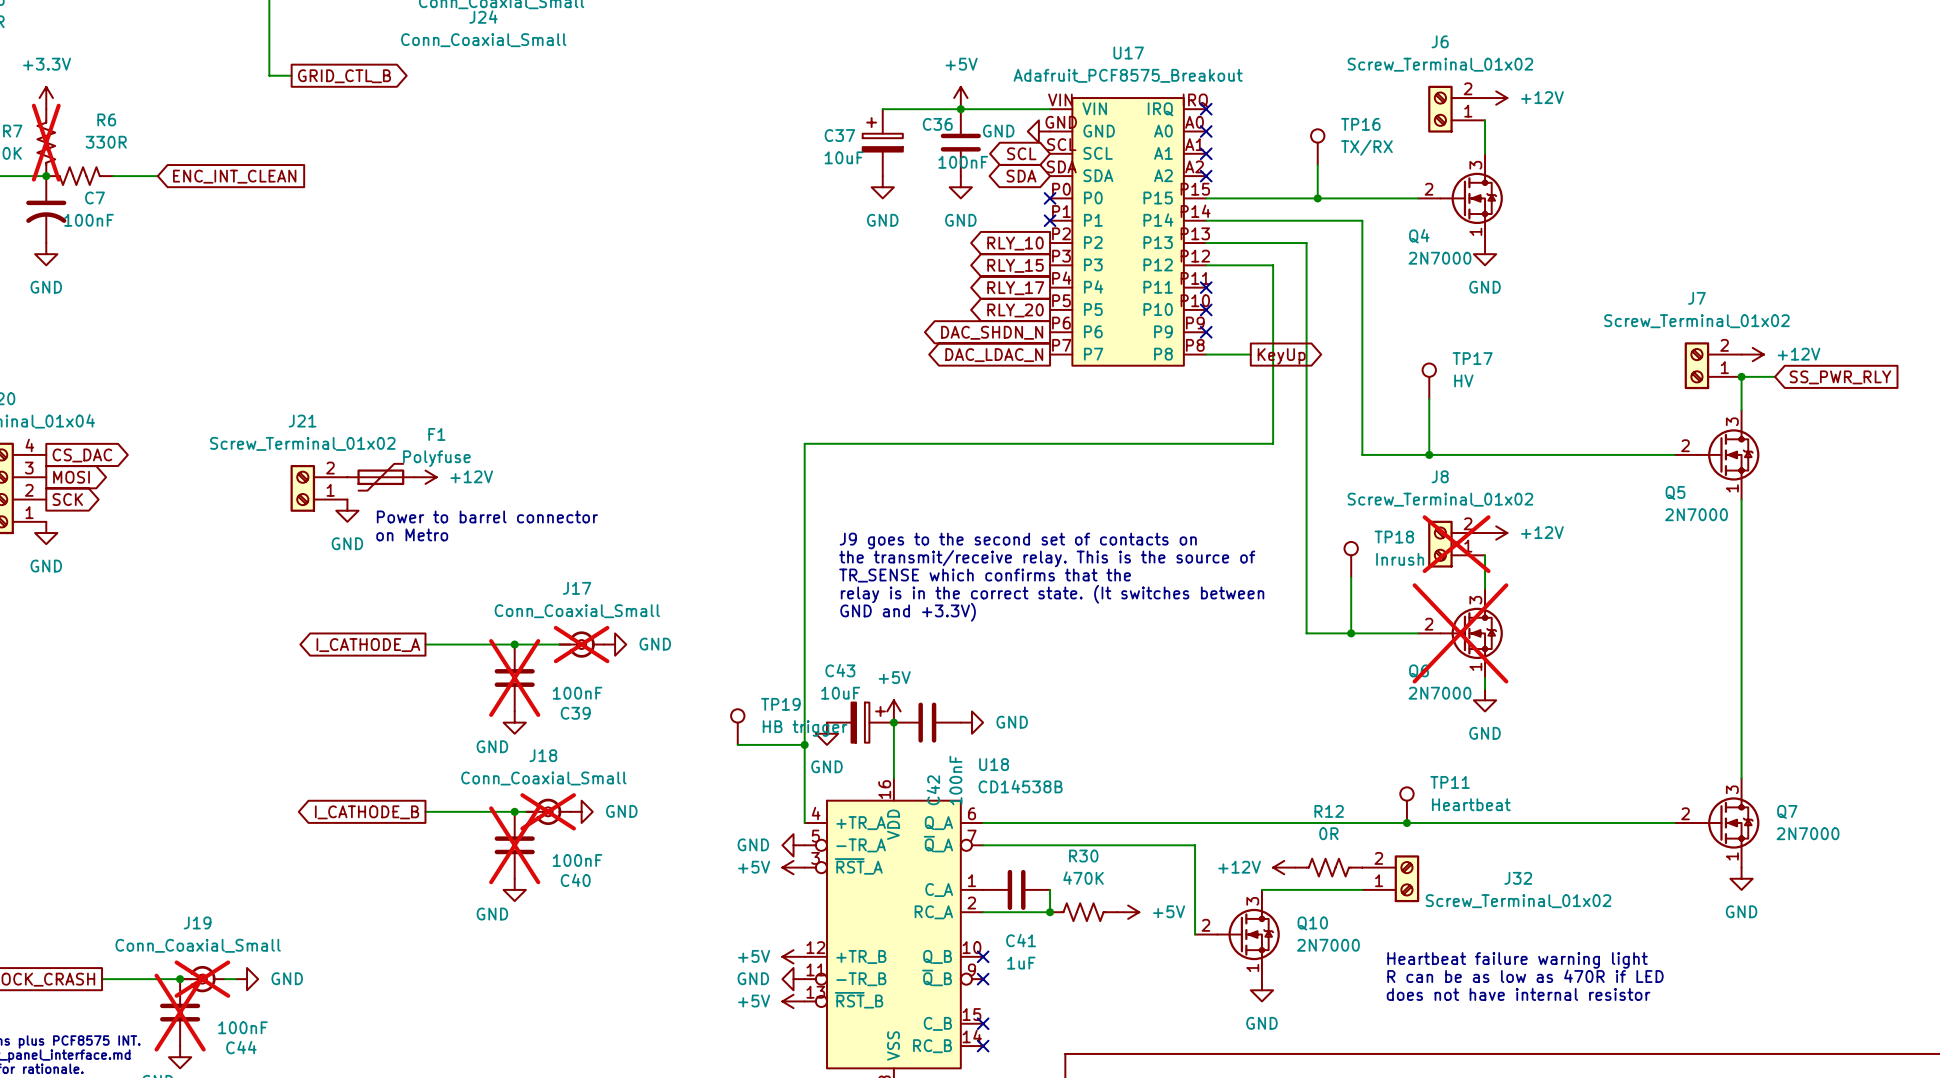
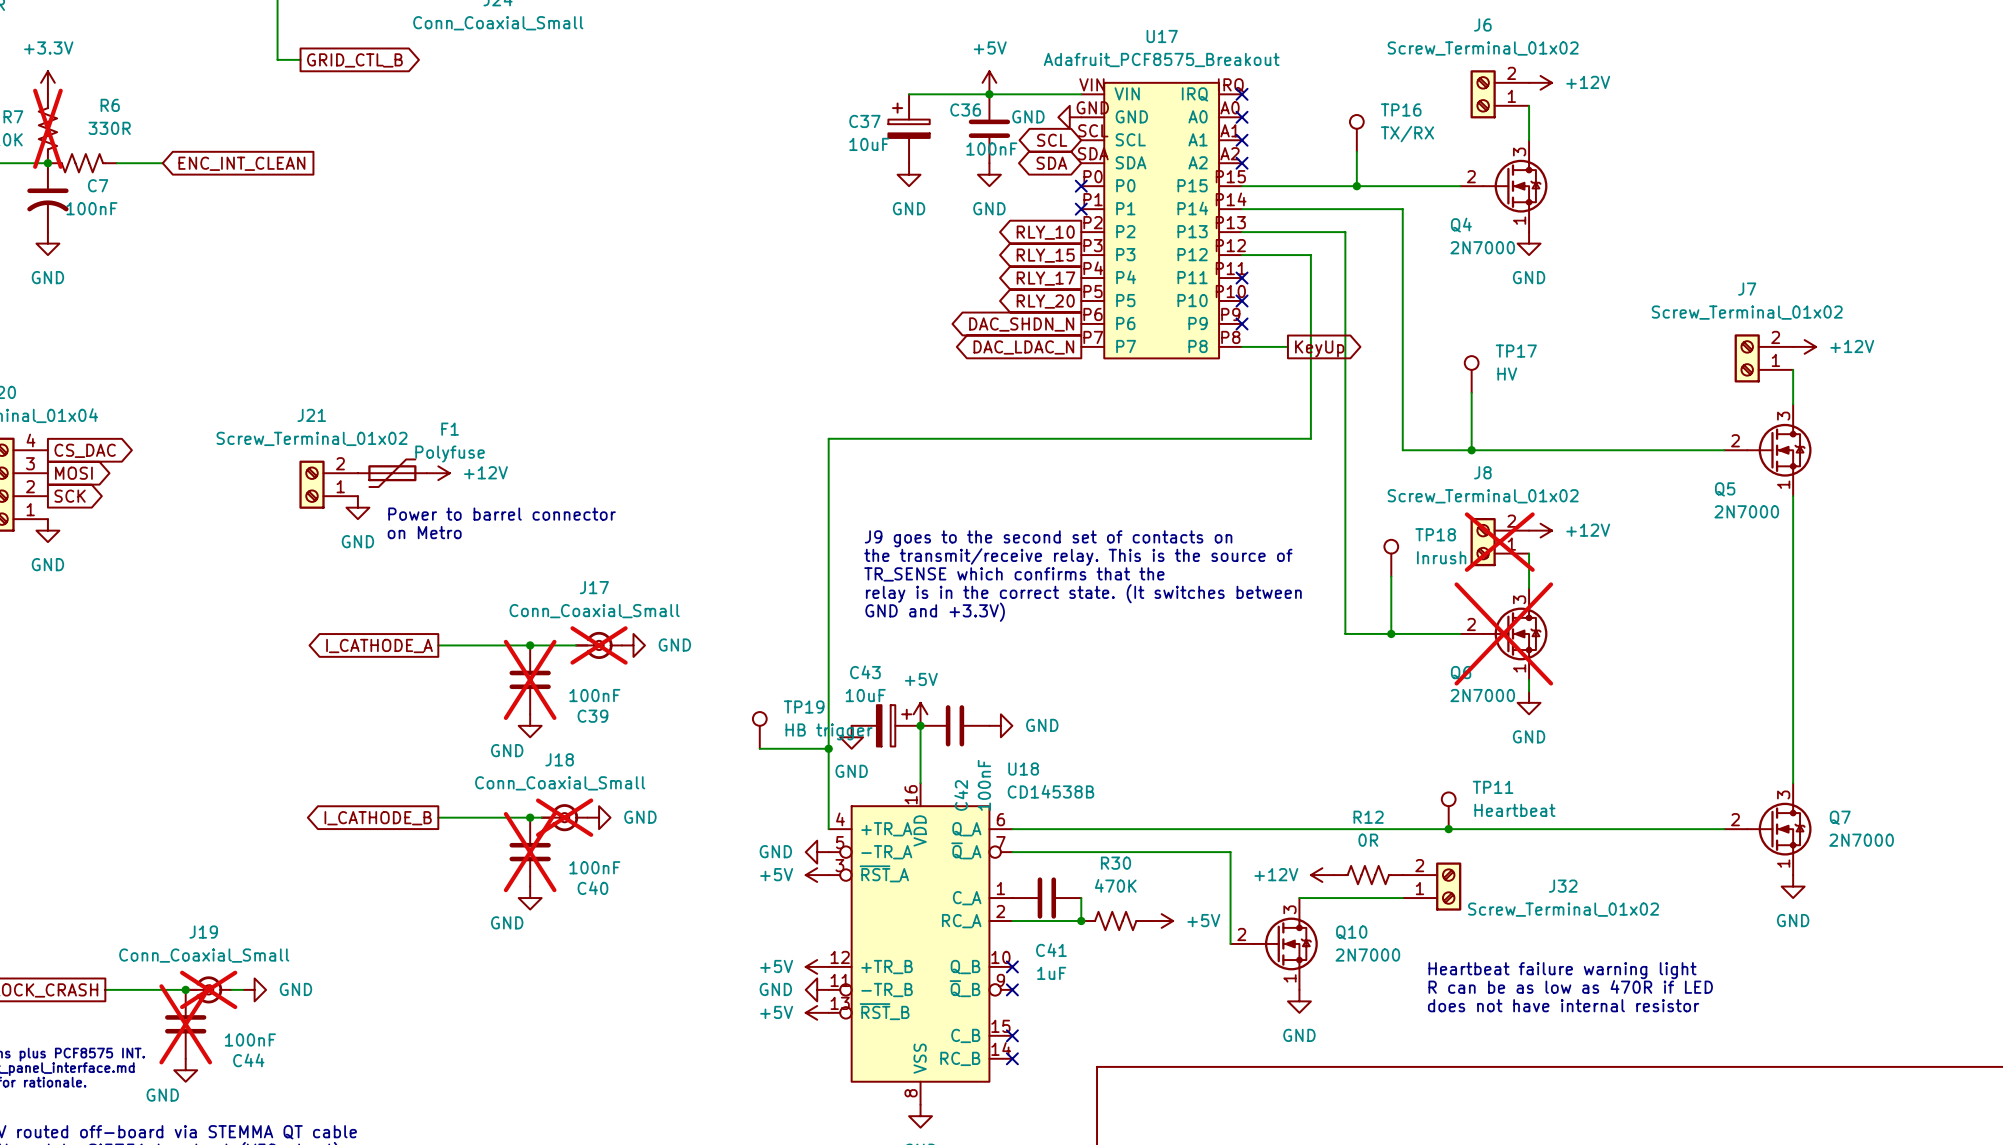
wire: (1741, 376) (1775, 376) -> none
junction: (1741, 376) -> none
global label: SS_PWR_RLY (1840, 377) -> none

